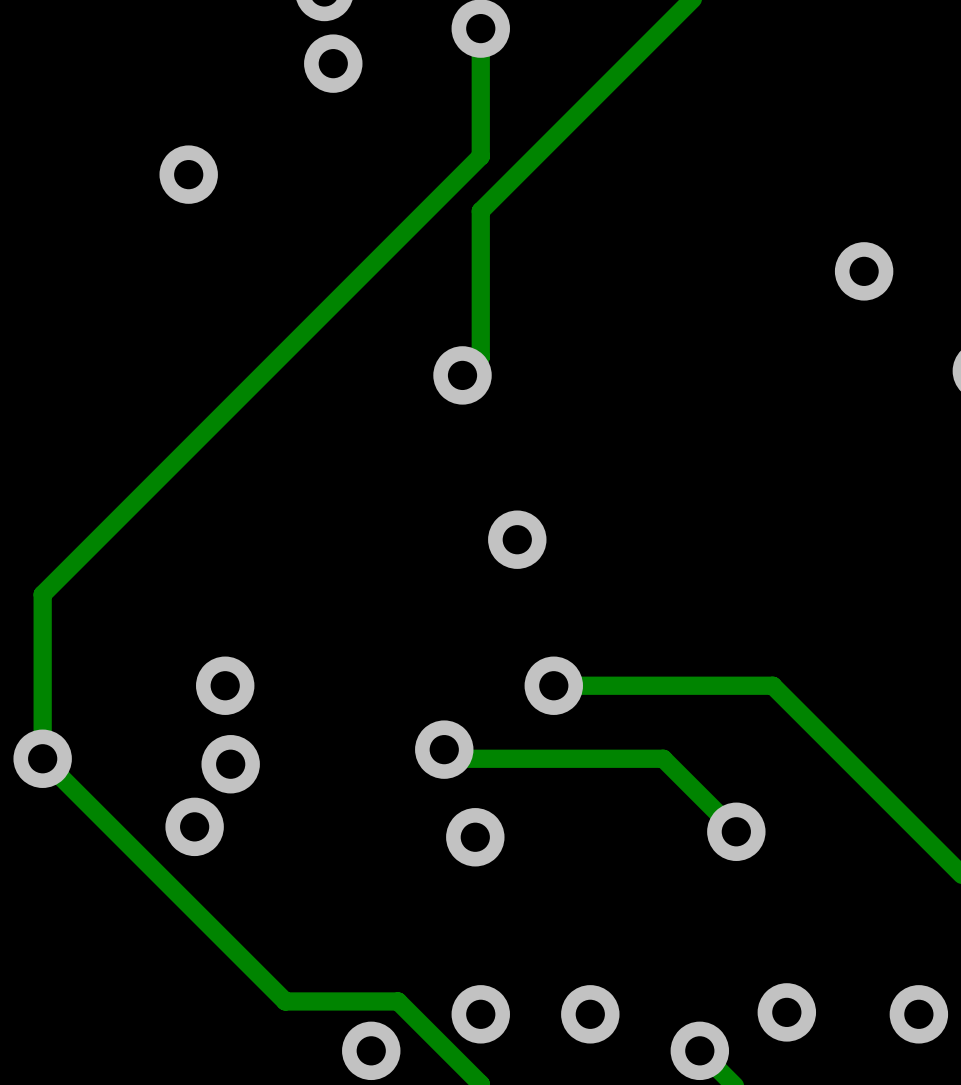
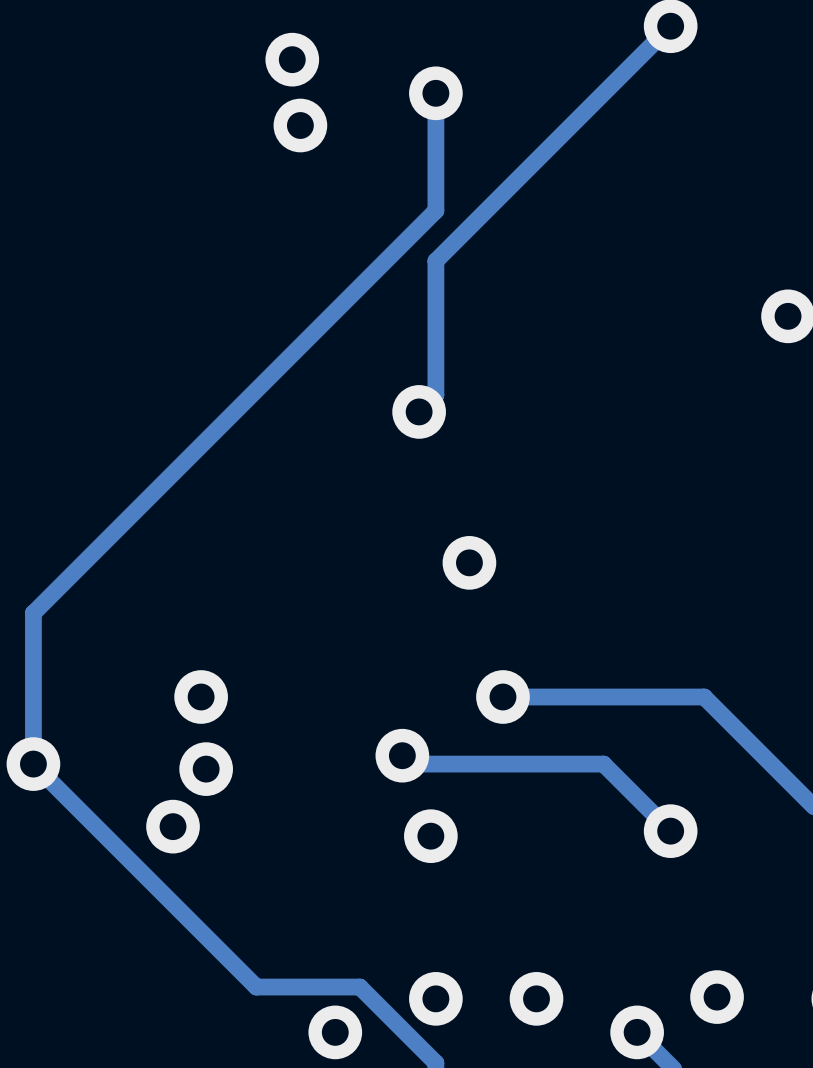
via: (188, 174) -> none

